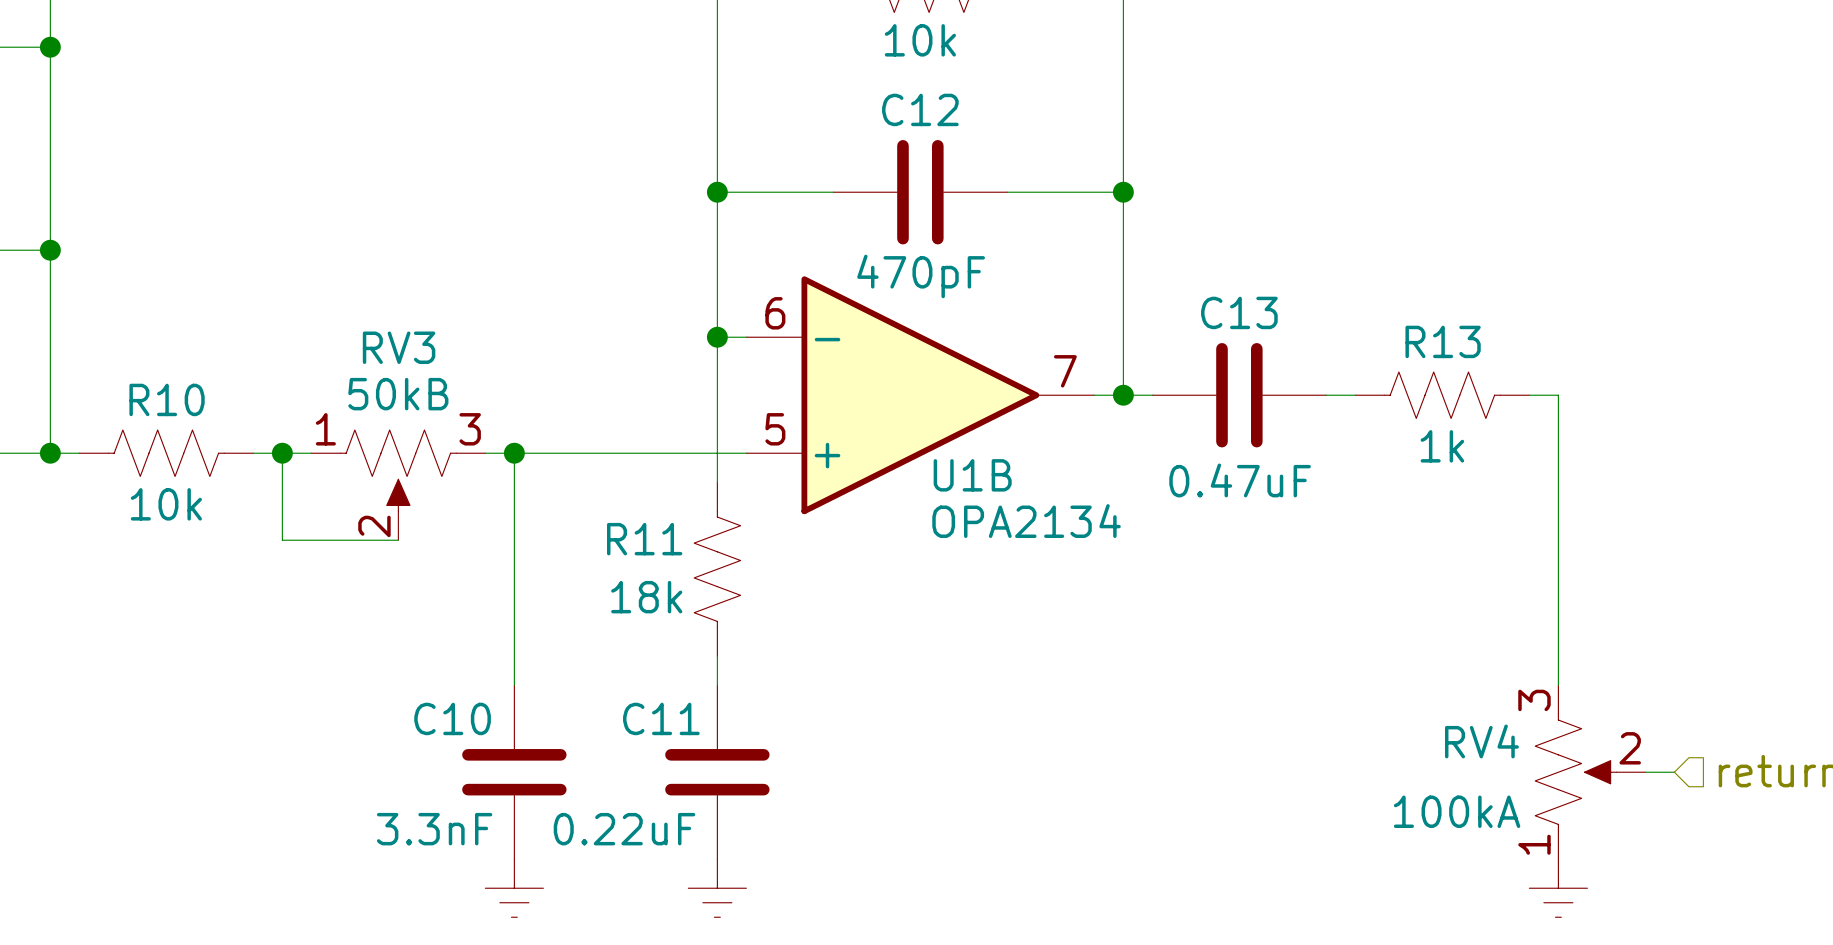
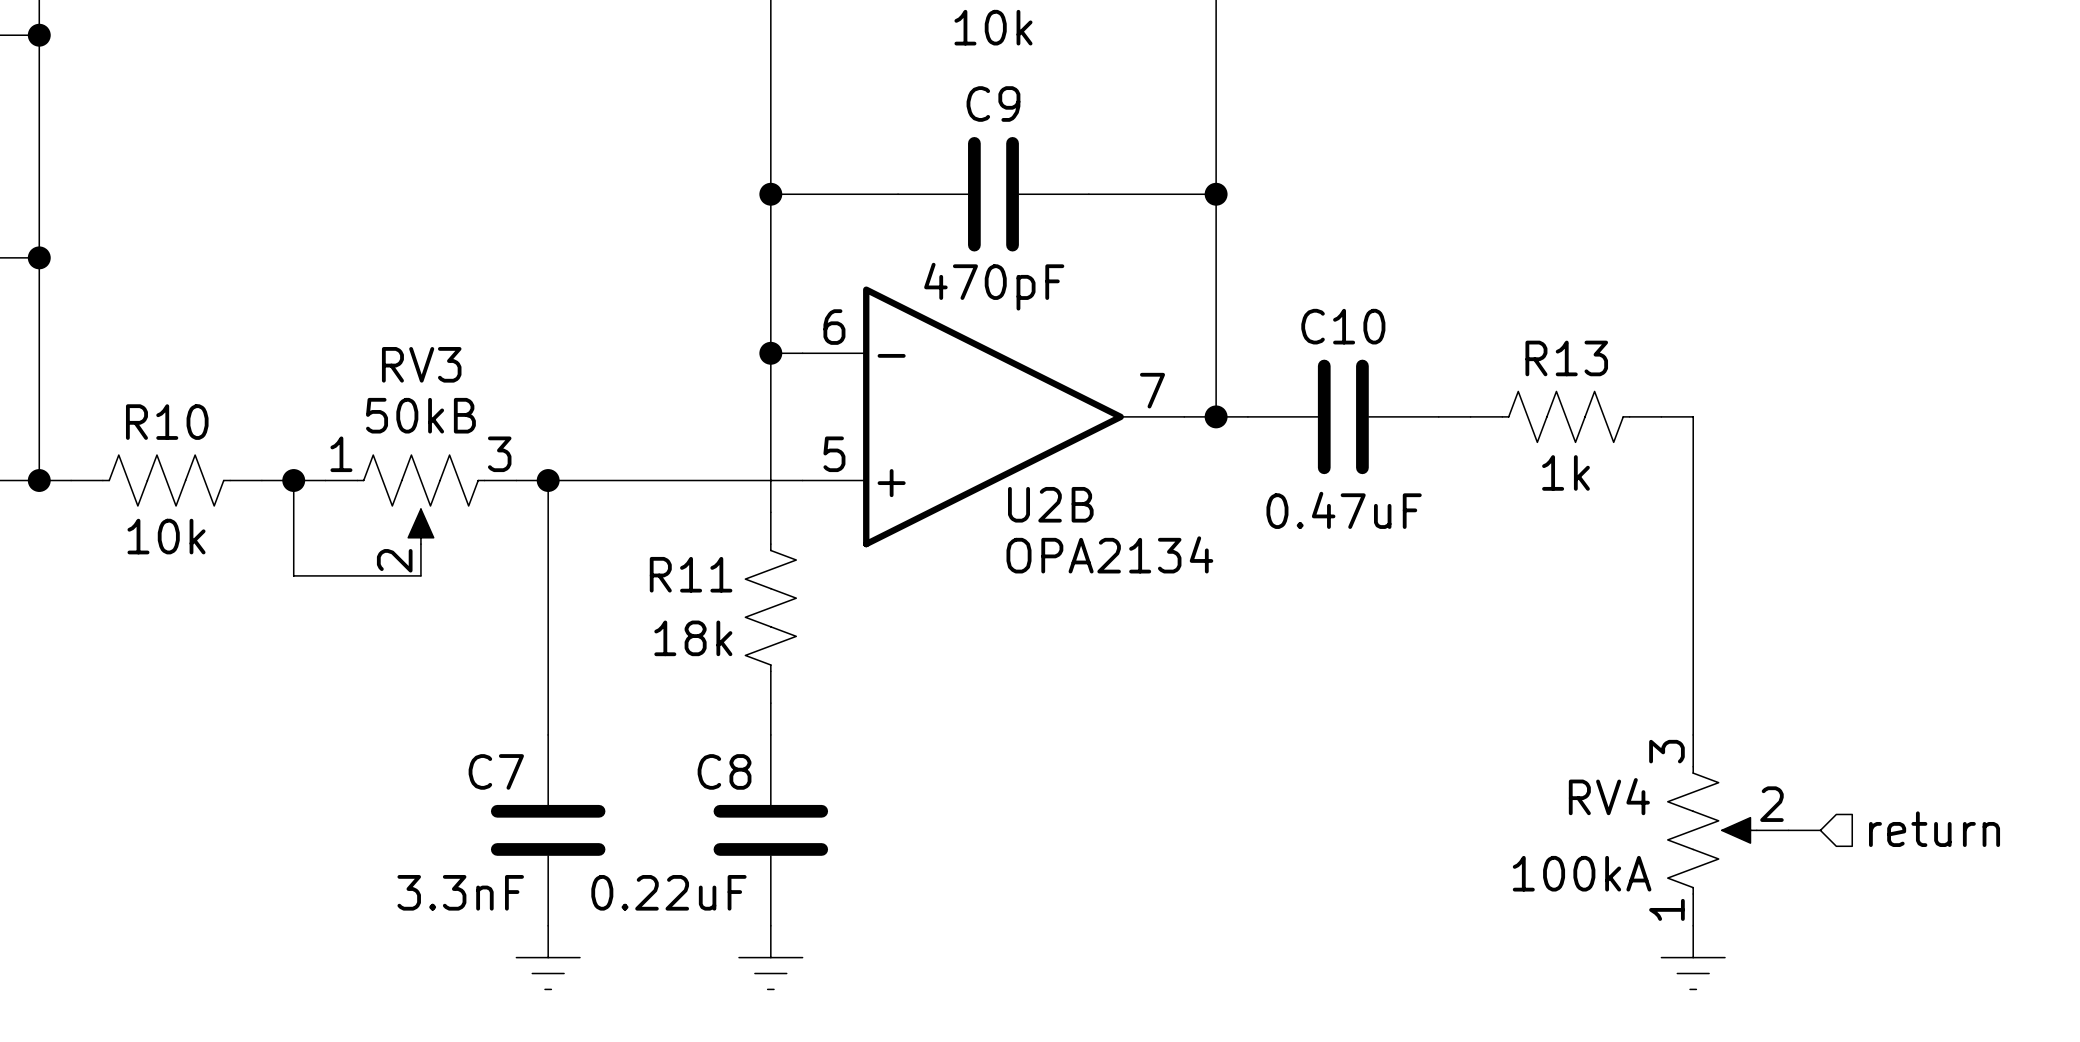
C12 name: C12 (920, 109) -> C9 (993, 104)
C13 name: C13 (1239, 312) -> C10 (1343, 326)
U1B name: U1B (972, 475) -> U2B (1050, 504)
C10 name: C10 (452, 718) -> C7 (496, 771)
C11 name: C11 (661, 718) -> C8 (724, 771)

